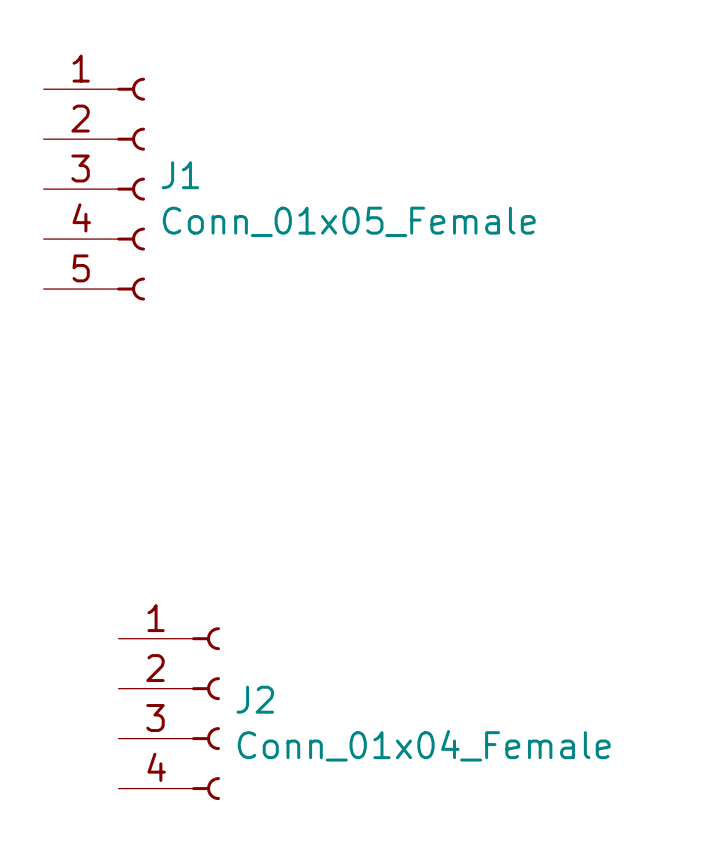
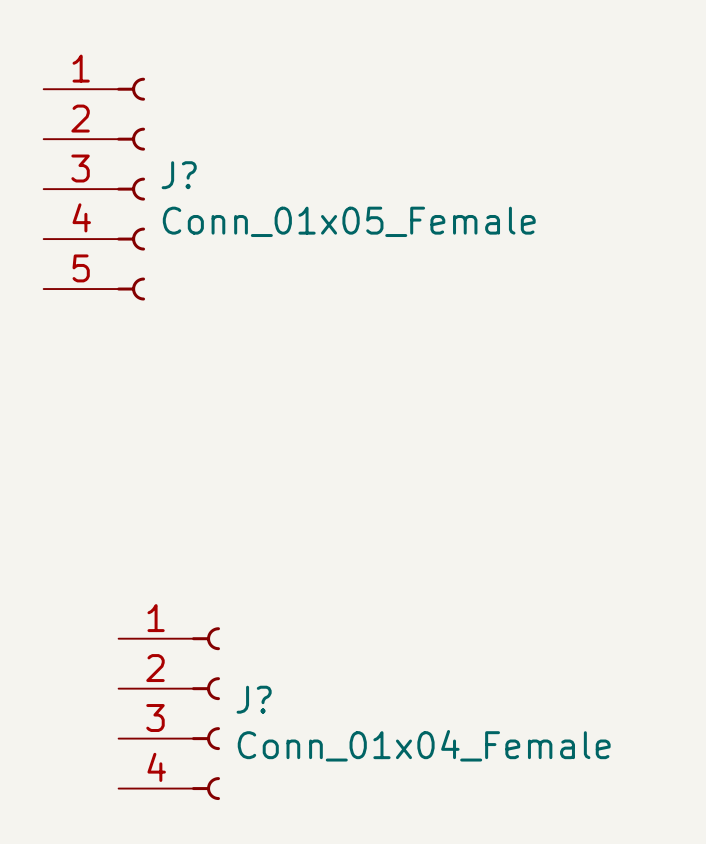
J1 name: J1 (180, 175) -> J? (179, 175)
J2 name: J2 (255, 699) -> J? (254, 699)

